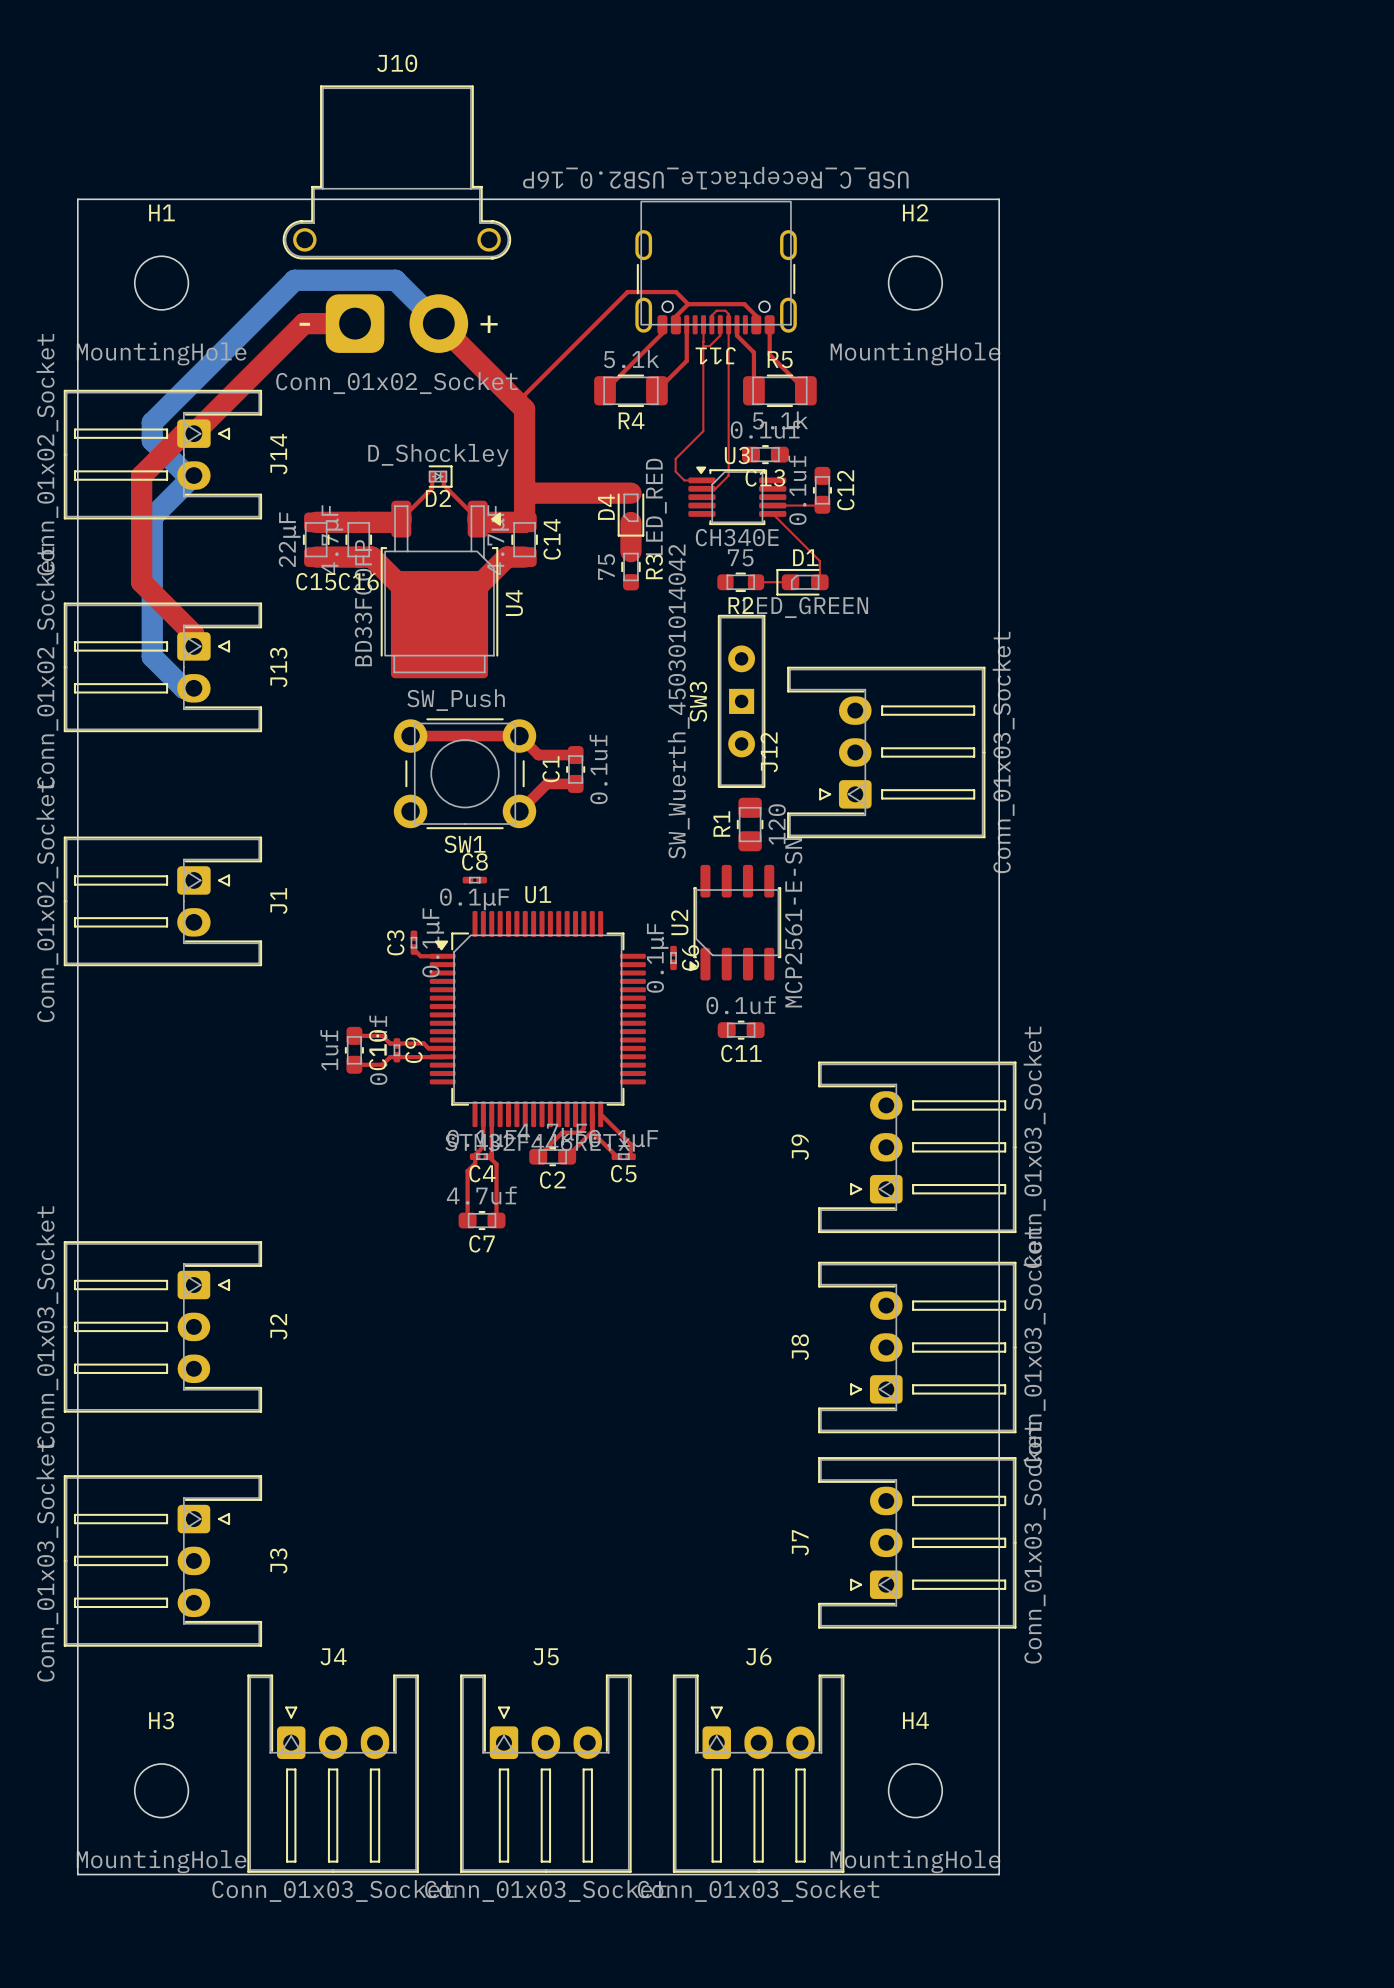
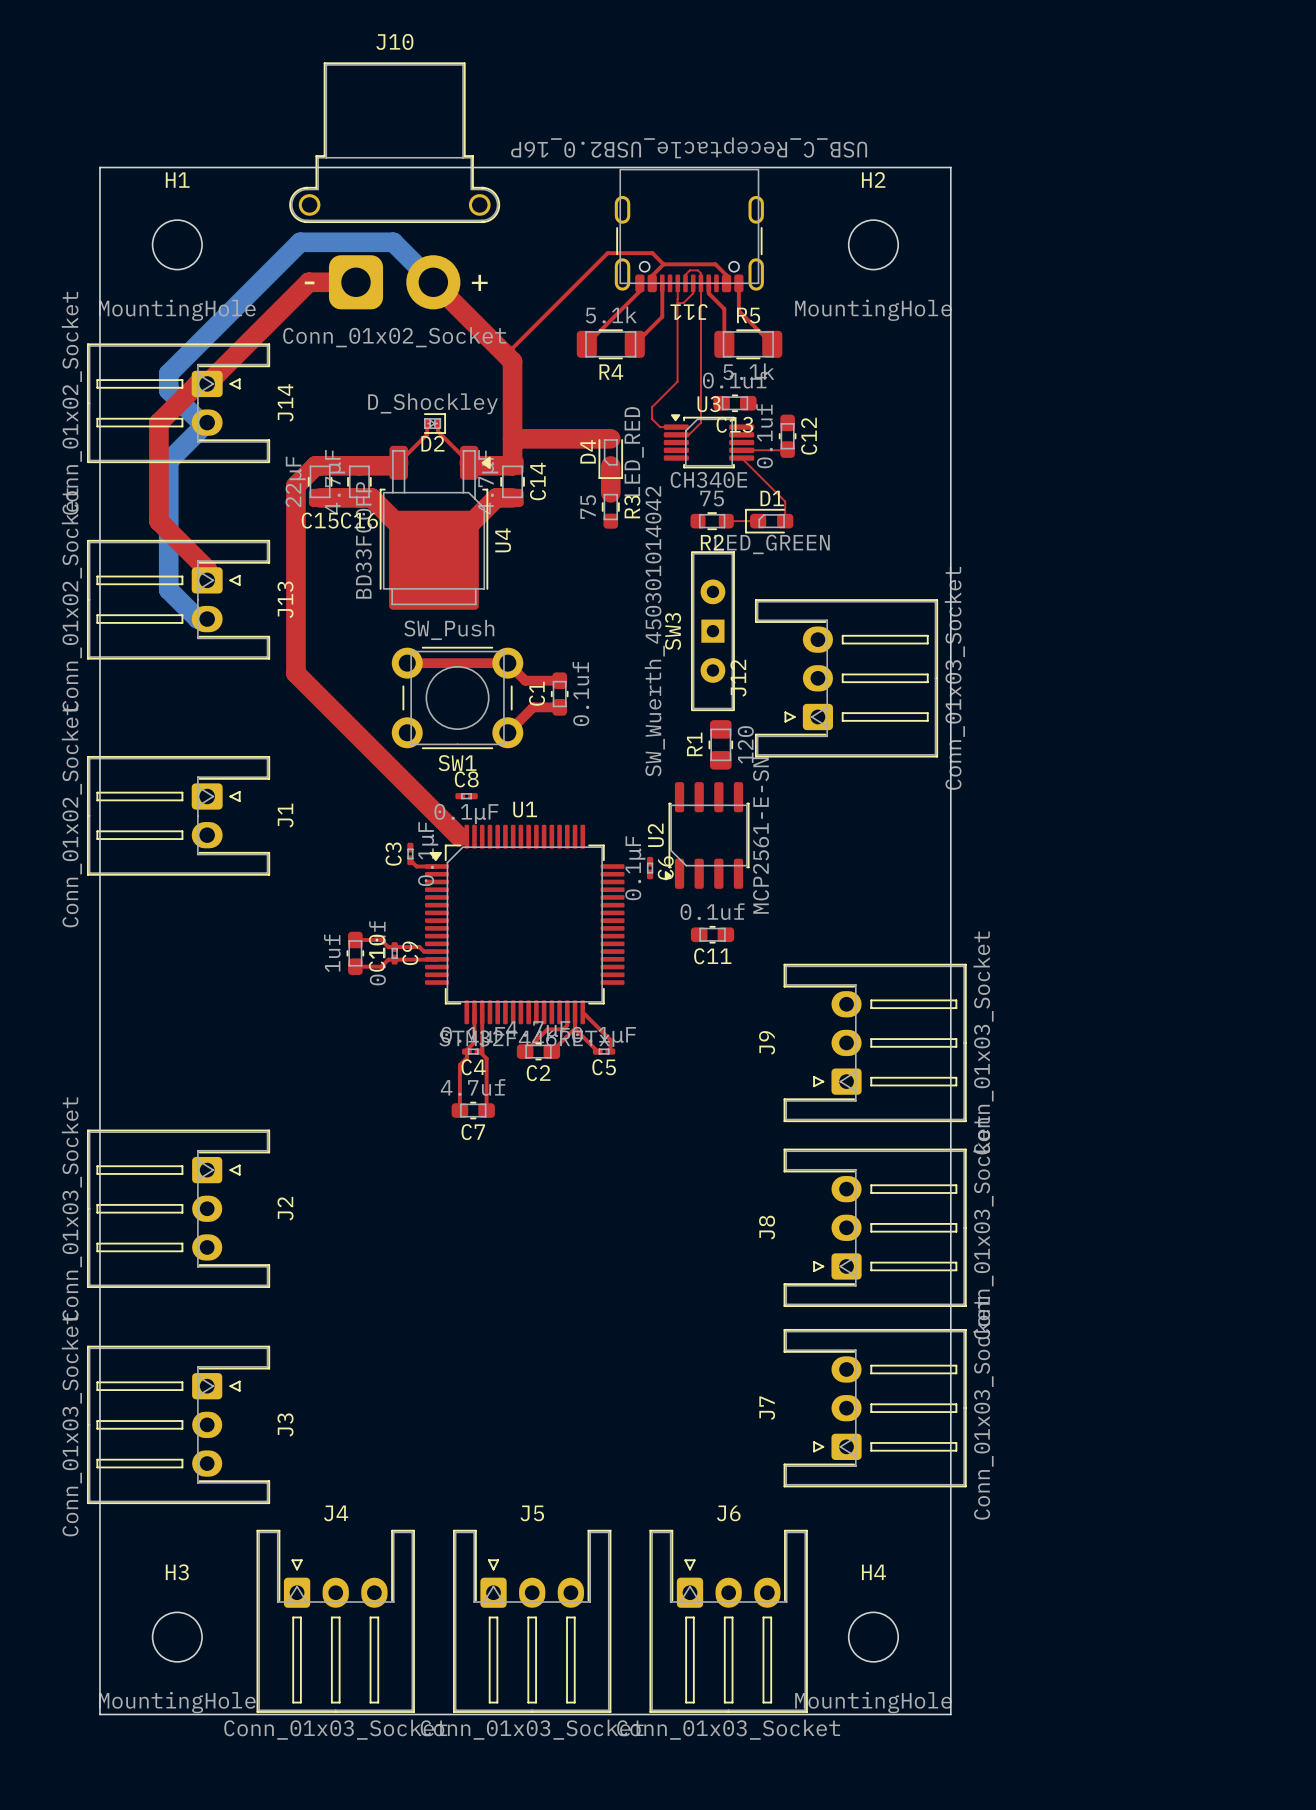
top track: none -> (320, 465) (315, 465) (295, 485) (295, 673) (459, 836)

